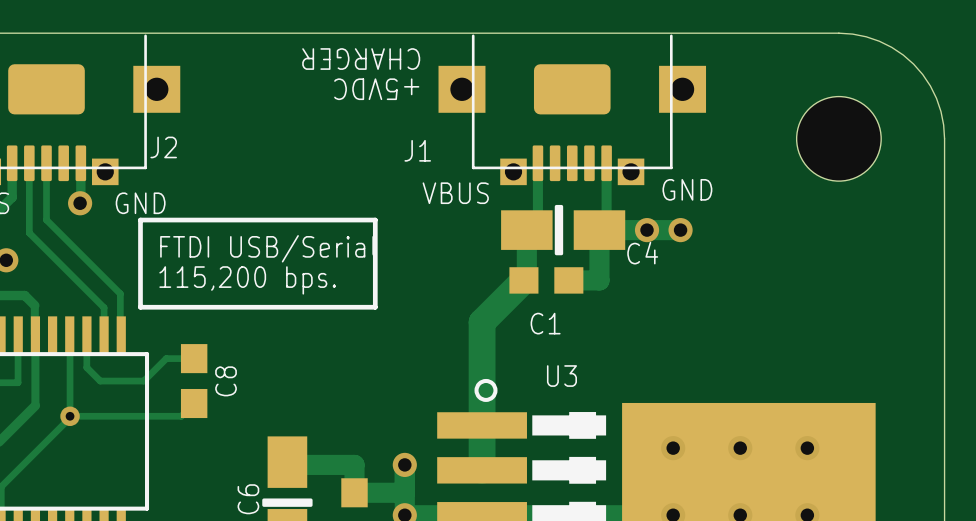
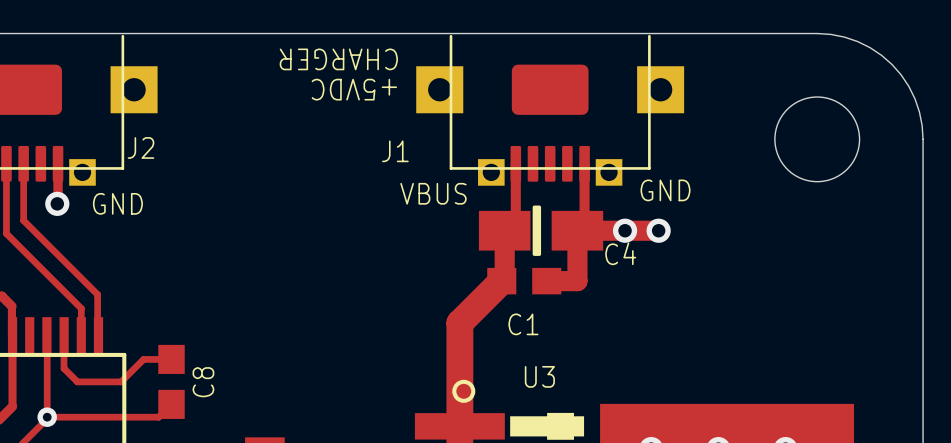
line: (140, 220) (375, 220) (375, 307) (140, 307) (140, 220) -> none
text: FTDI USB/Serial (268, 248) -> none
text: 115,200 bps. (247, 280) -> none

